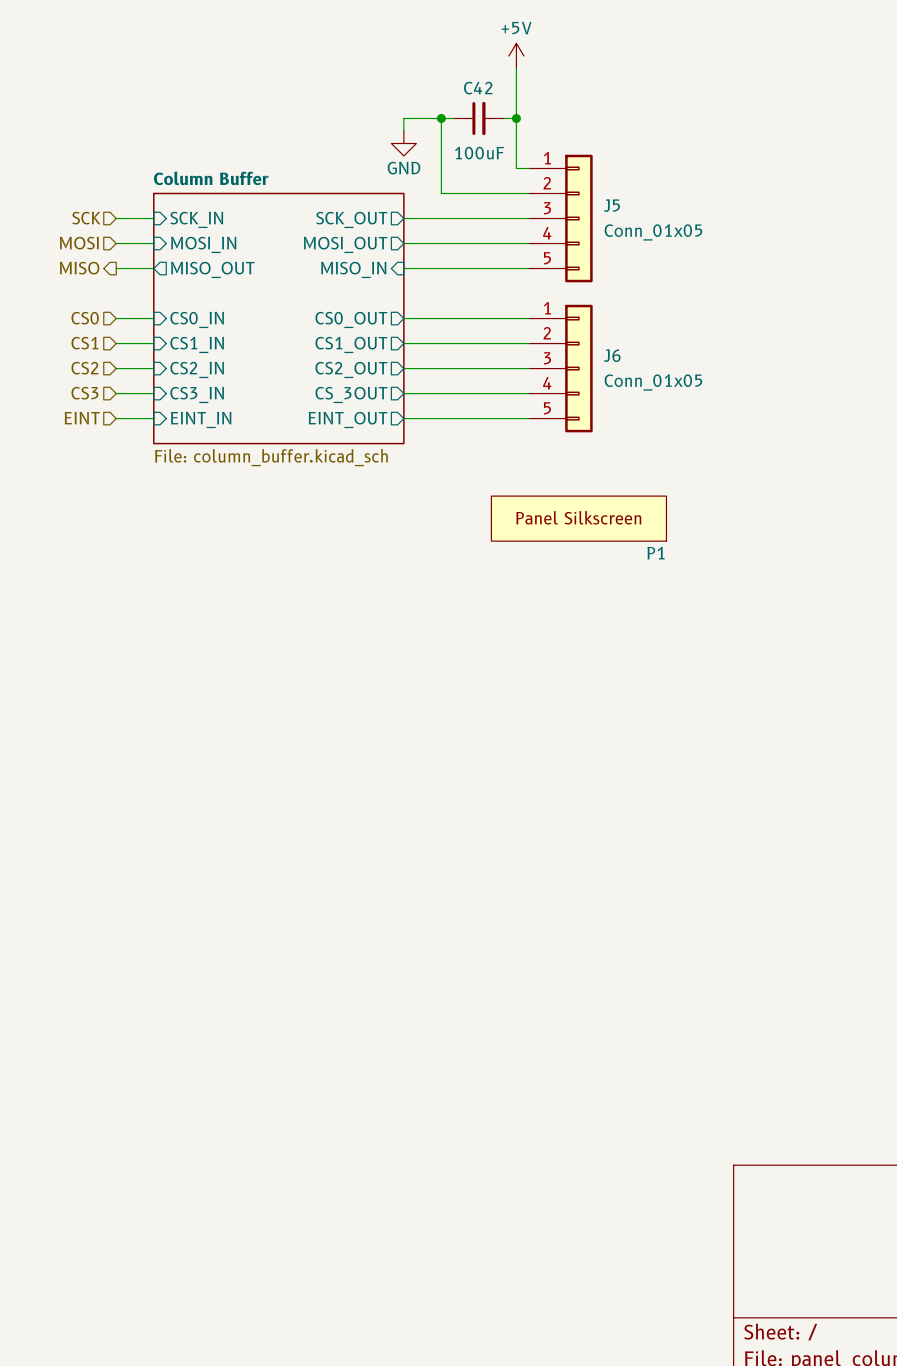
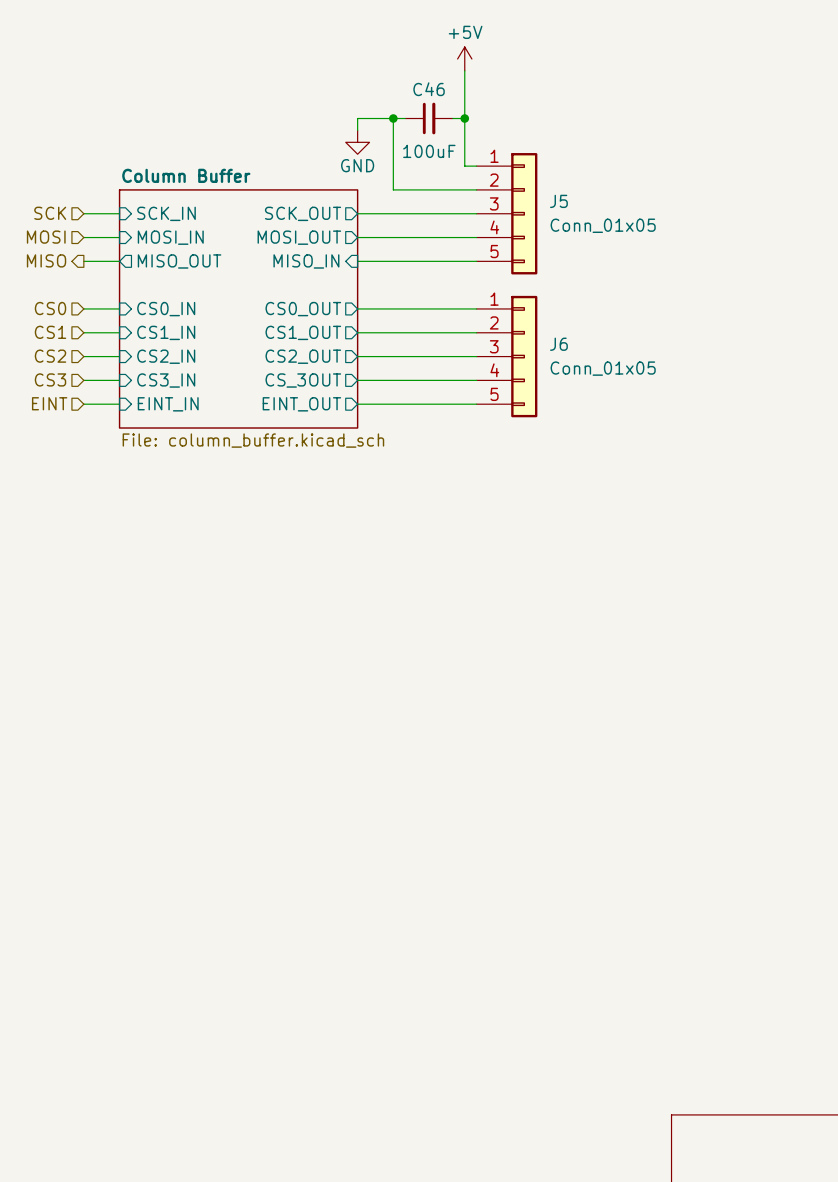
C42 name: C42 (478, 88) -> C46 (429, 89)
P1: (578, 518) -> none

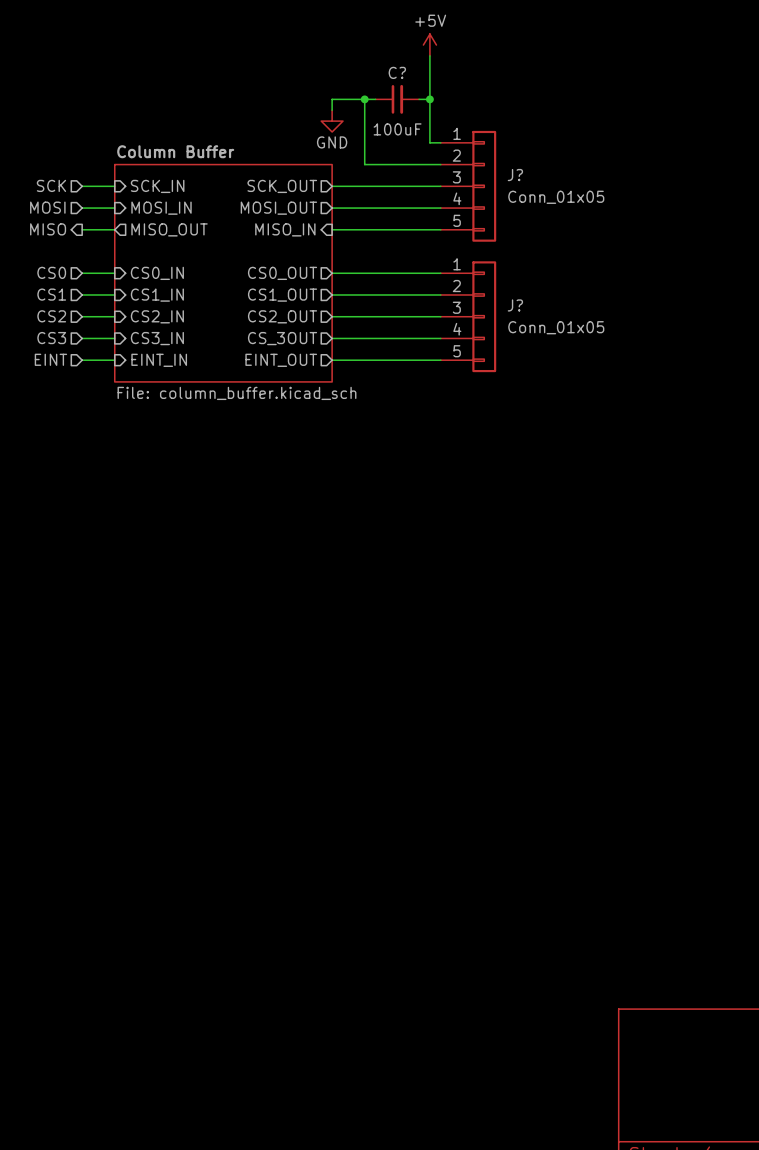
C46 name: C46 (429, 89) -> C? (397, 72)
J5 name: J5 (558, 201) -> J? (515, 175)
J6 name: J6 (558, 344) -> J? (515, 305)

